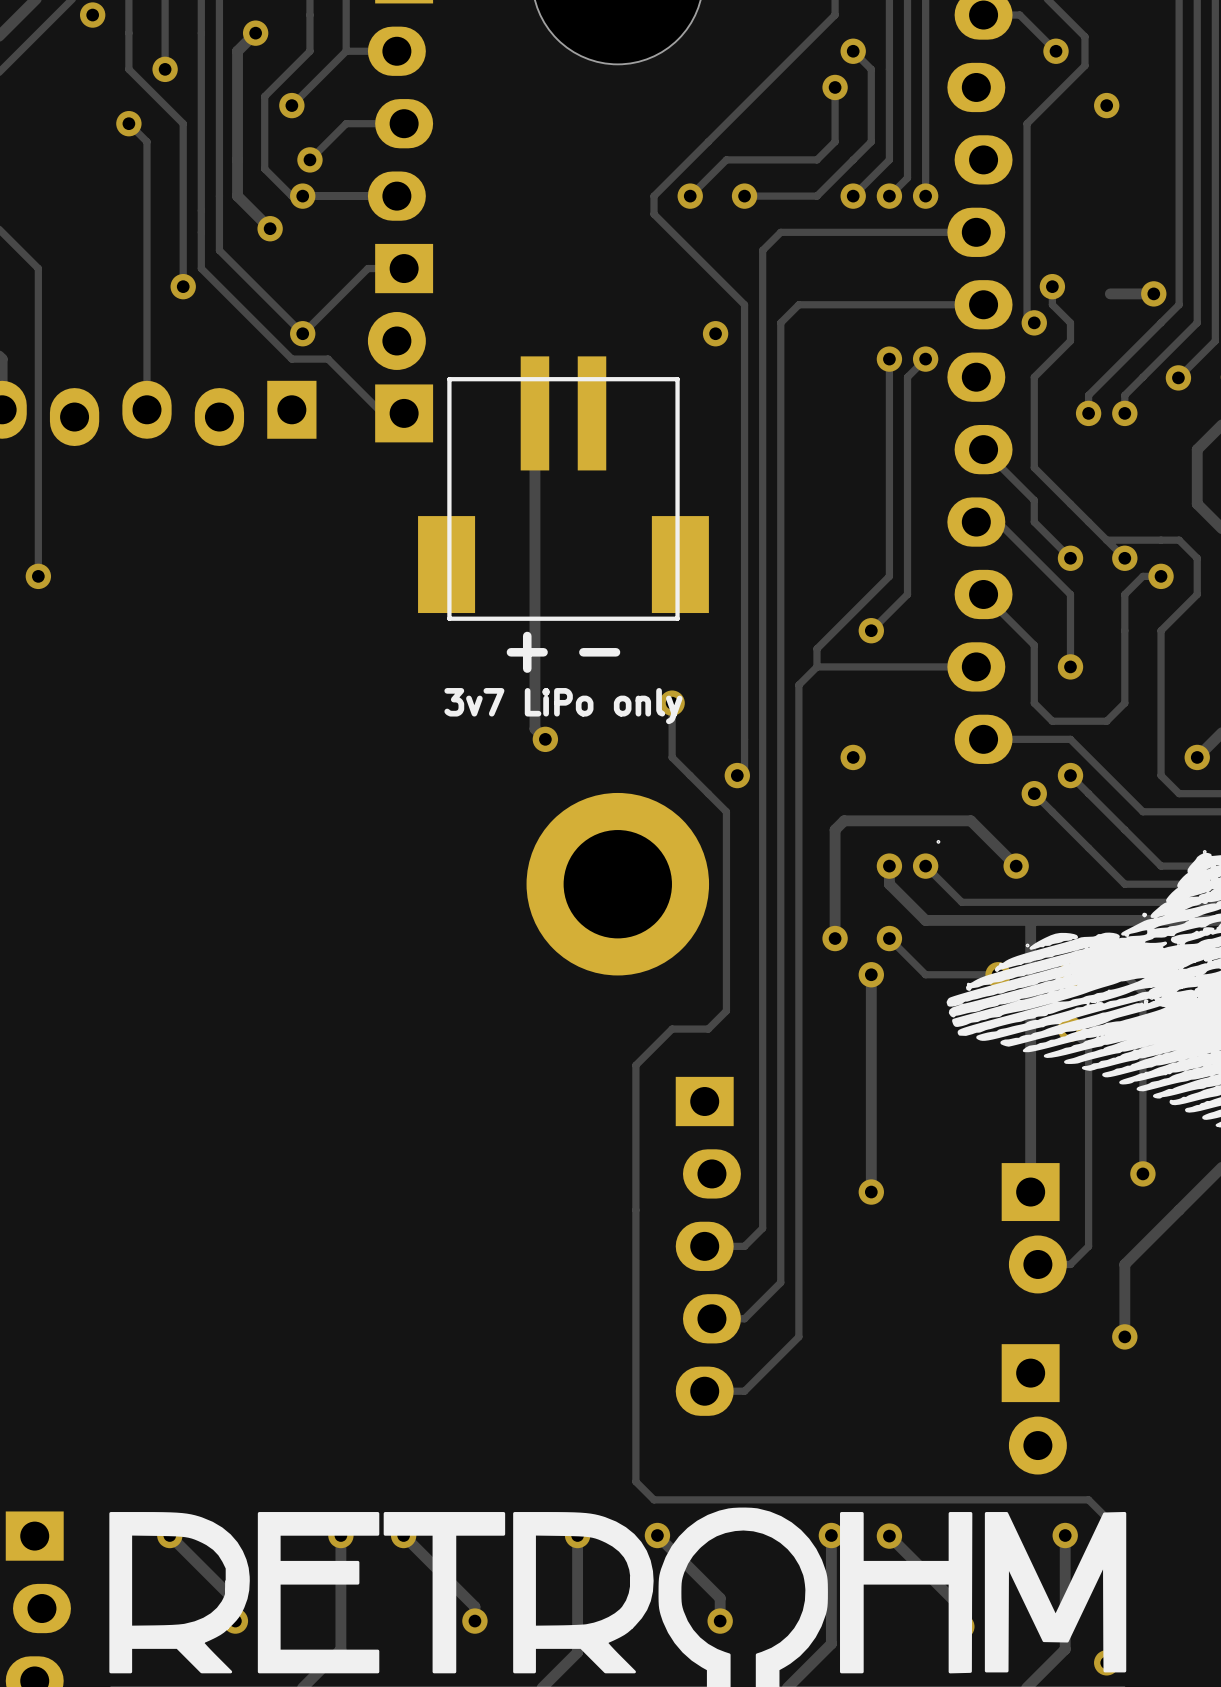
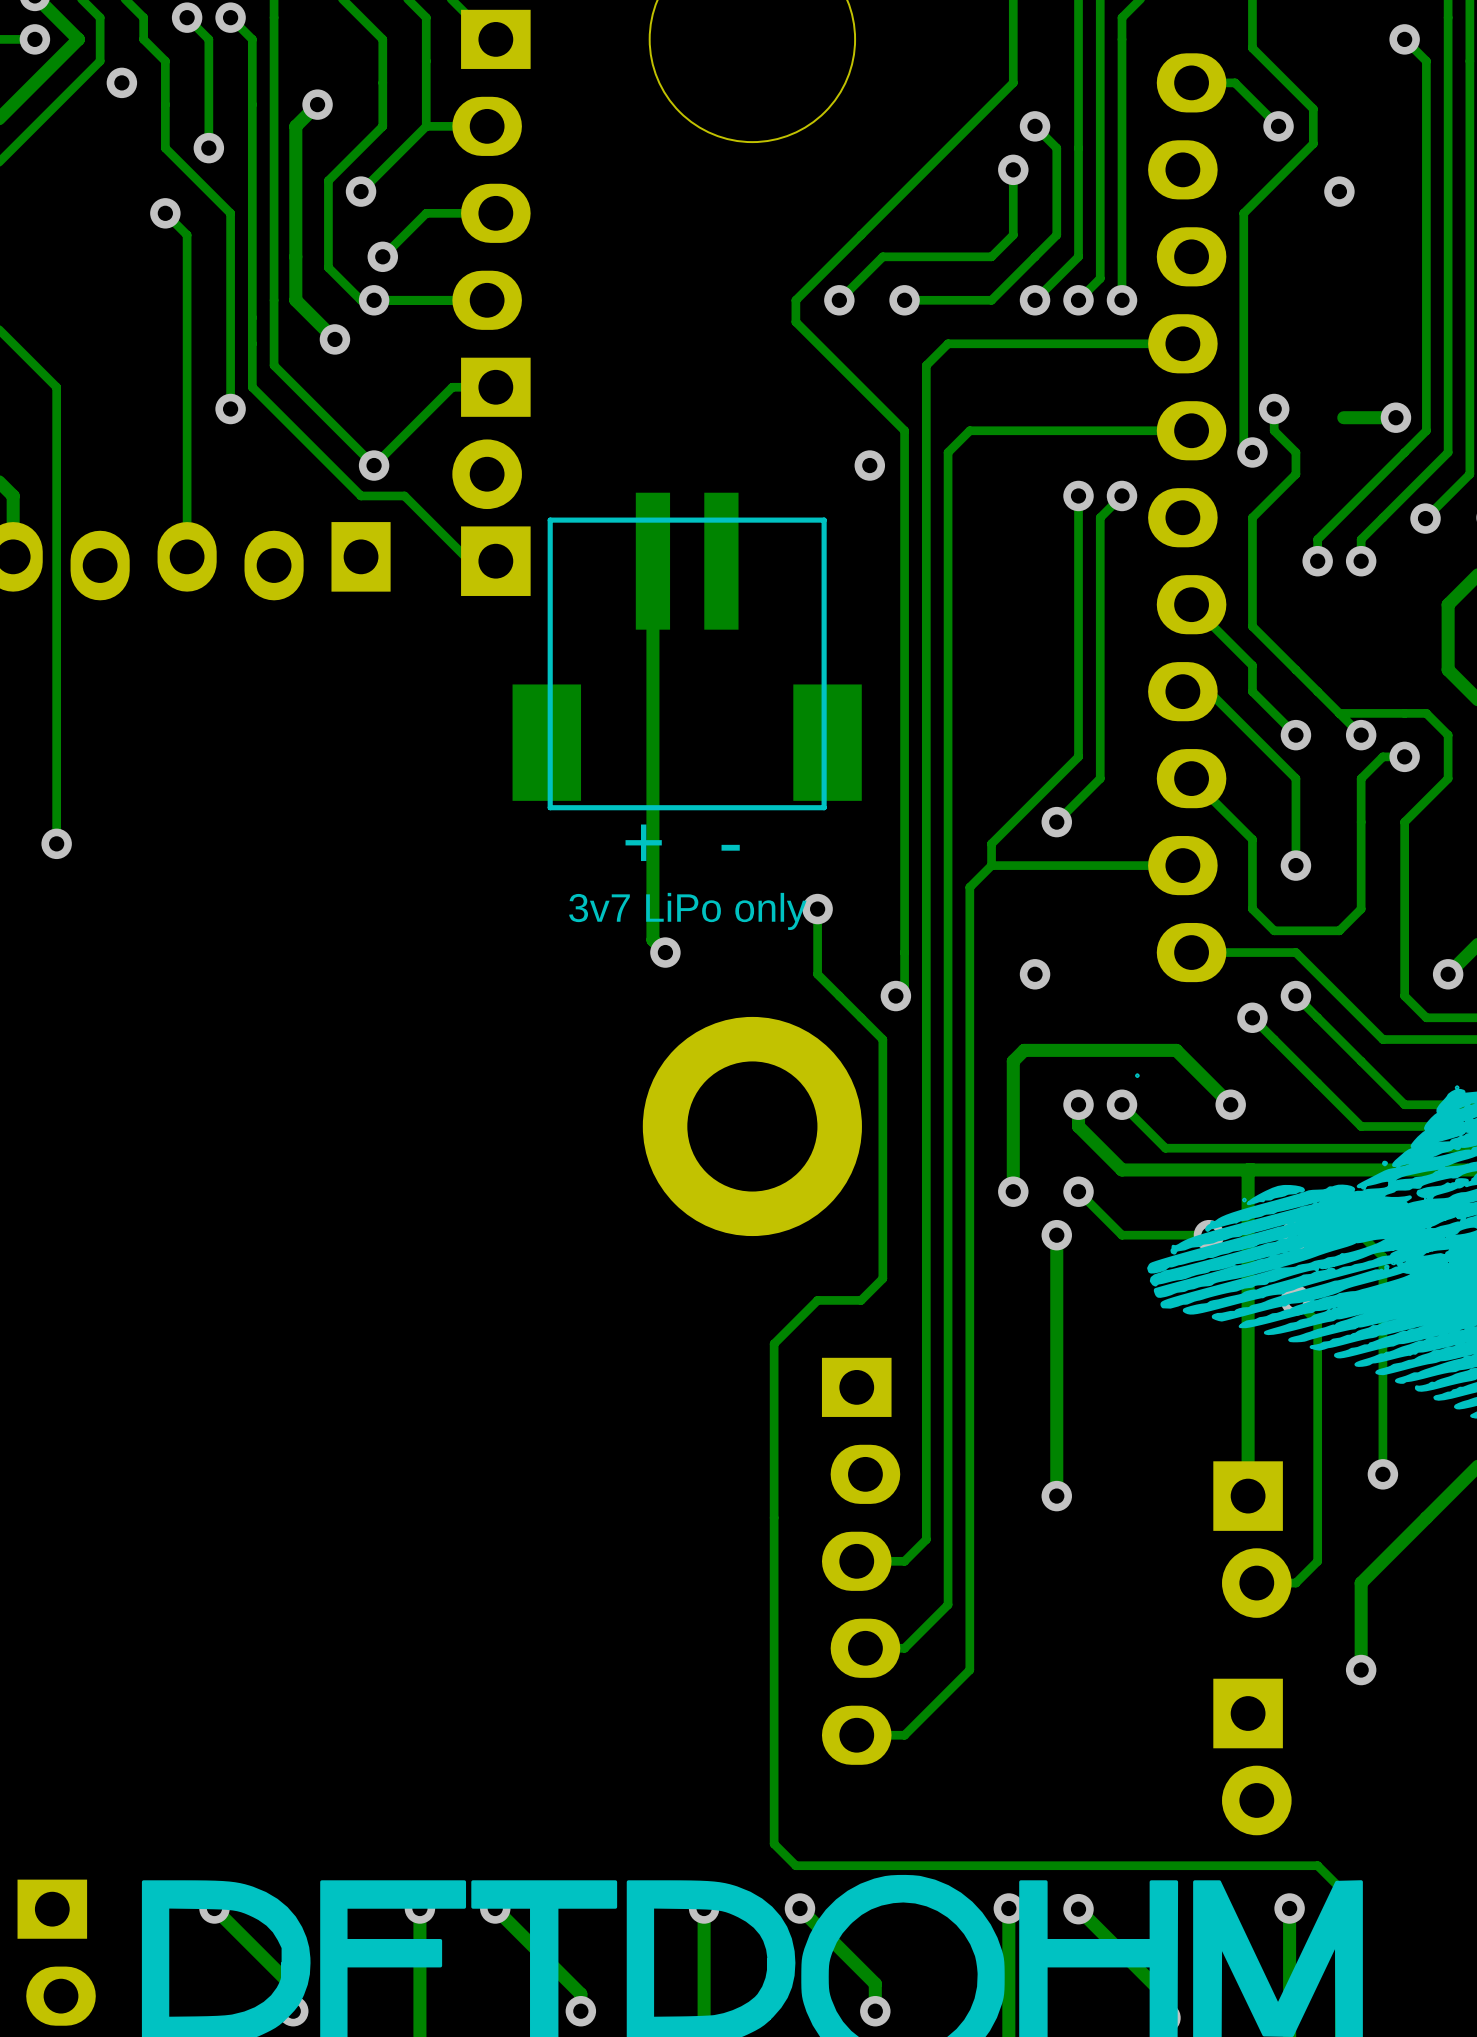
track: none -> (56, 756) (56, 843)
via position: (38, 576) -> (56, 843)

